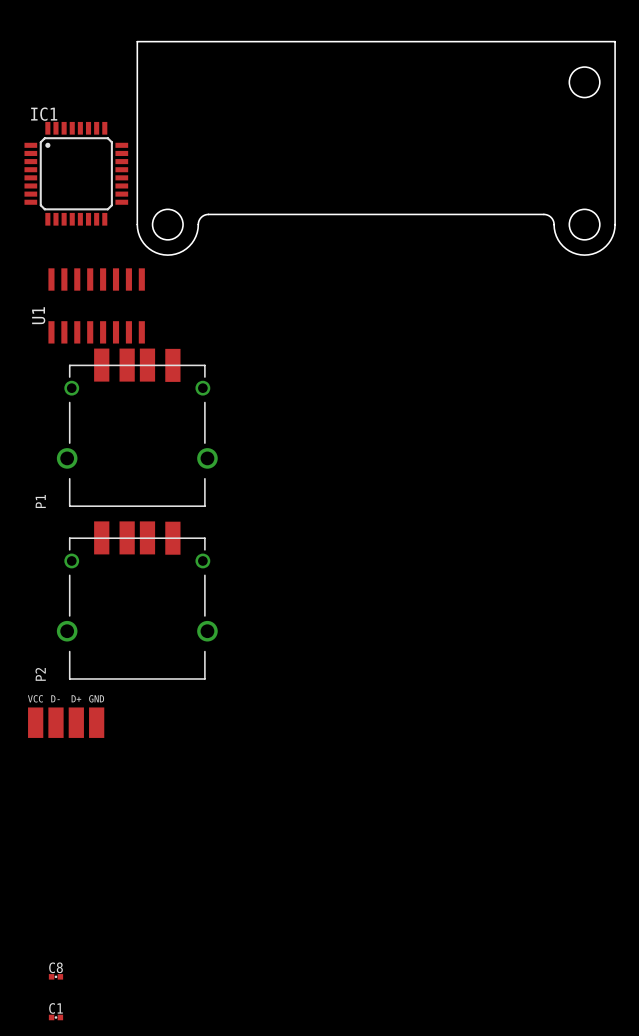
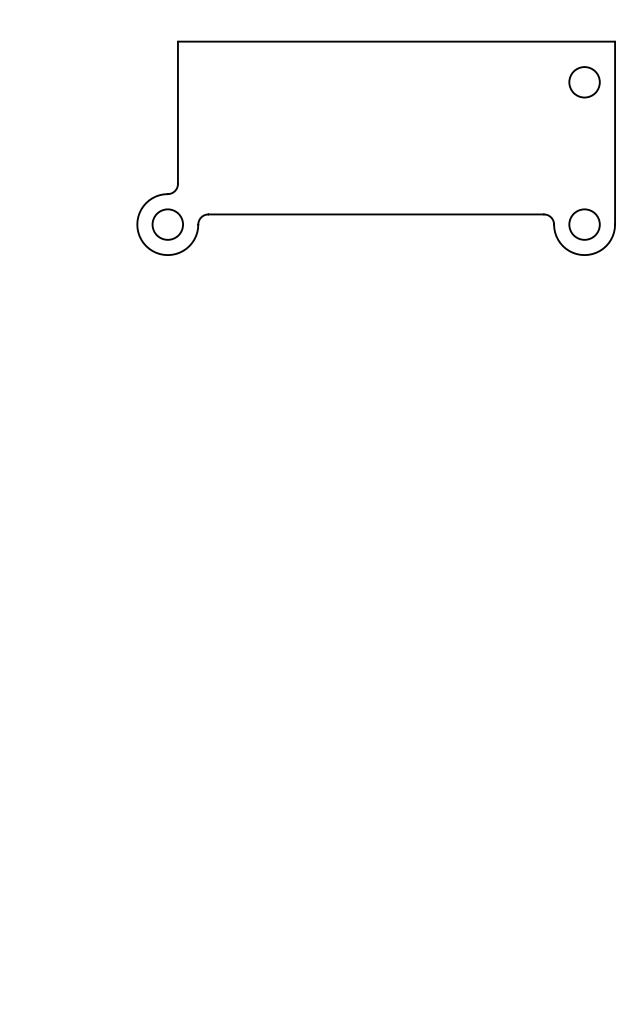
board edge: (177, 41) (137, 41) (137, 228) (141, 239) (149, 248) (159, 254) (167, 255) (179, 252) (189, 246) (195, 236) (198, 224) -> (177, 41) (177, 186) (172, 192) (156, 196) (146, 203) (138, 216) (137, 228) (141, 239) (149, 248) (159, 254) (167, 255) (179, 252) (189, 246) (195, 236) (198, 224)
IC1: (76, 173) -> none
U1: (96, 305) -> none
P1: (137, 427) -> none
P2: (137, 600) -> none
part: (66, 722) -> none
C8: (55, 976) -> none
C1: (55, 1017) -> none

